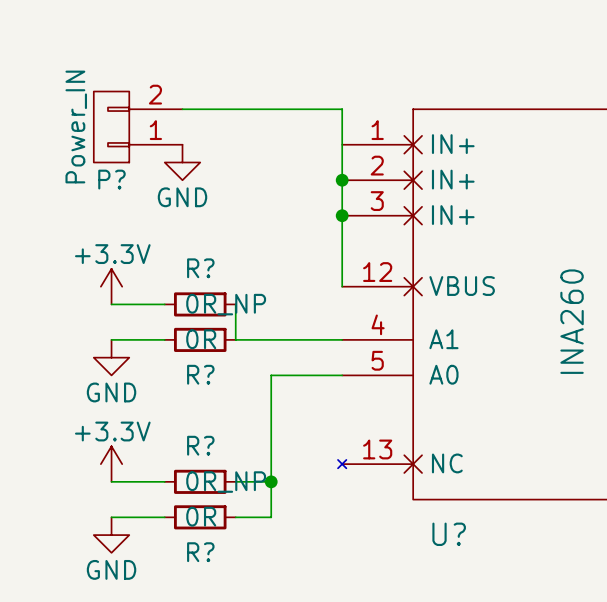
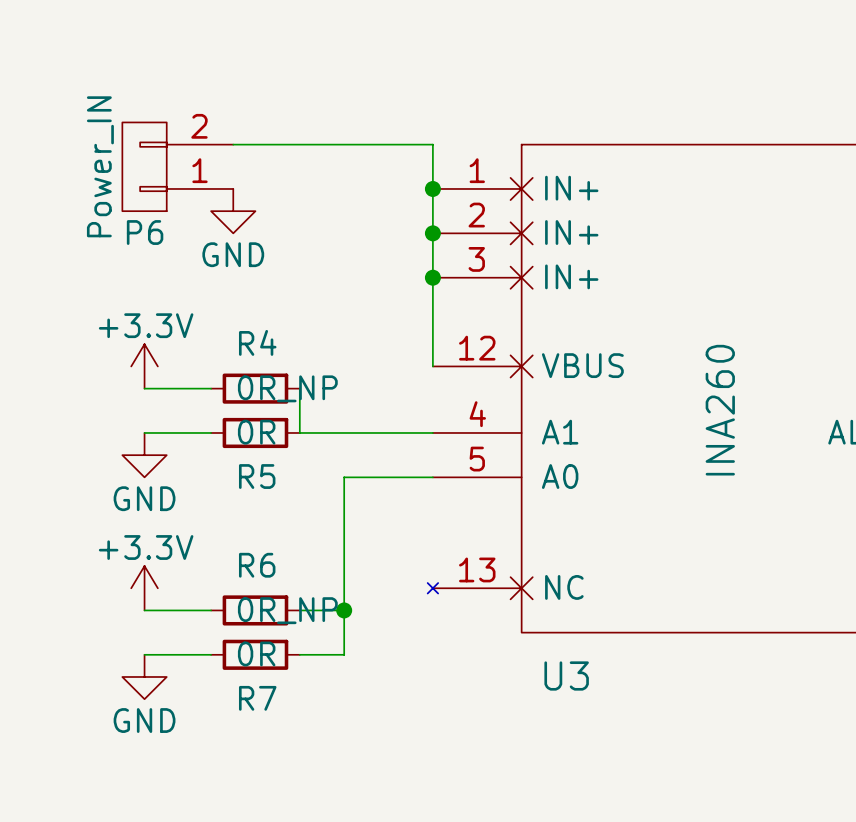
junction: none -> (432, 188)
P? name: P? (111, 179) -> P6 (145, 232)
R? name: R? (200, 268) -> R4 (257, 342)
R? name: R? (200, 374) -> R5 (257, 476)
R? name: R? (200, 445) -> R6 (257, 565)
U? name: U? (449, 534) -> U3 (566, 675)
R? name: R? (200, 552) -> R7 (257, 698)

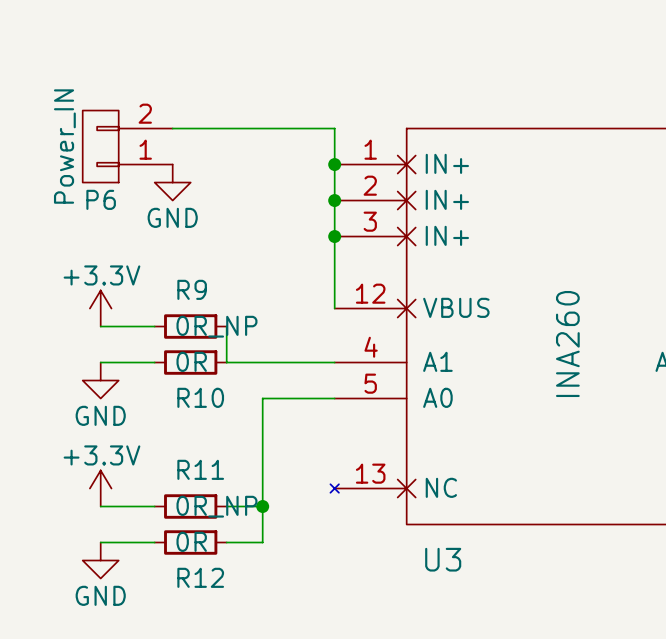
R4 name: R4 (257, 342) -> R9 (192, 289)
R5 name: R5 (257, 476) -> R10 (200, 397)
R6 name: R6 (257, 565) -> R11 (200, 469)
R7 name: R7 (257, 698) -> R12 (200, 577)

